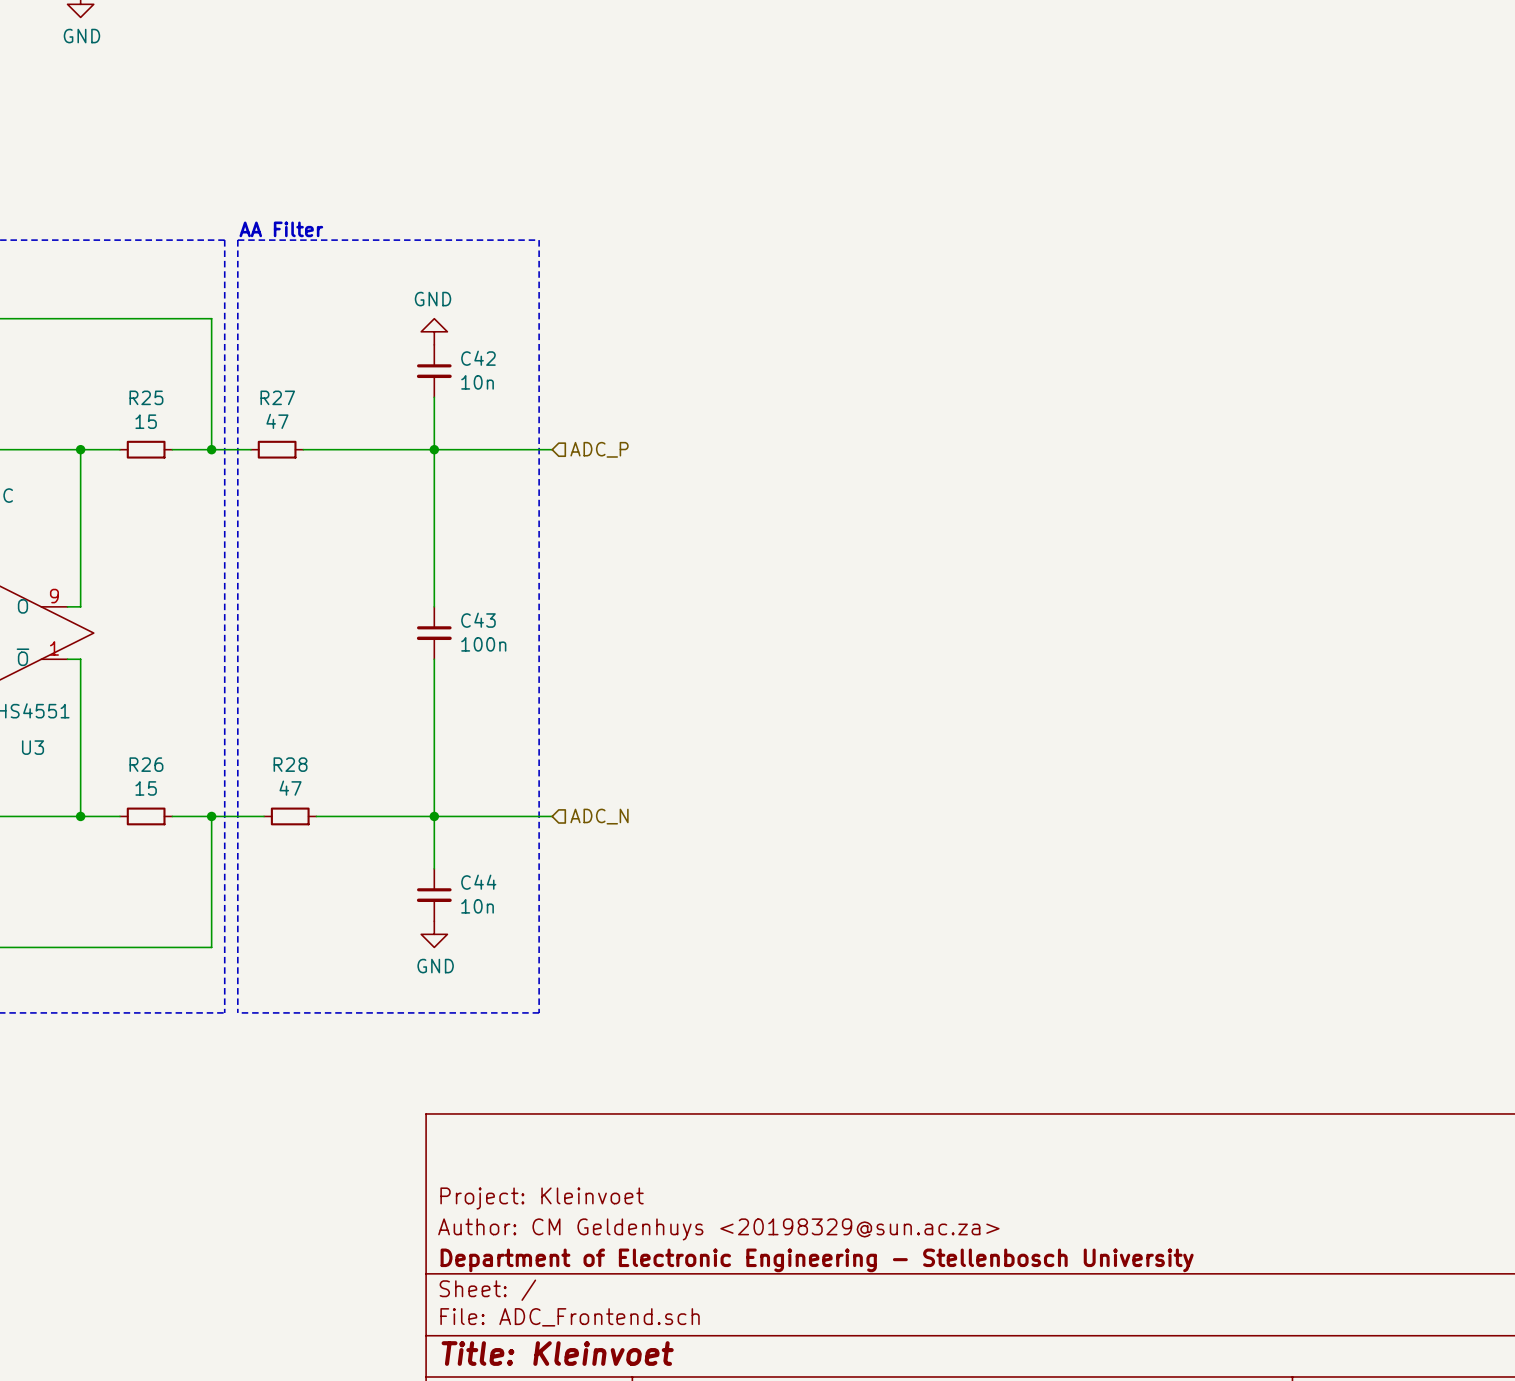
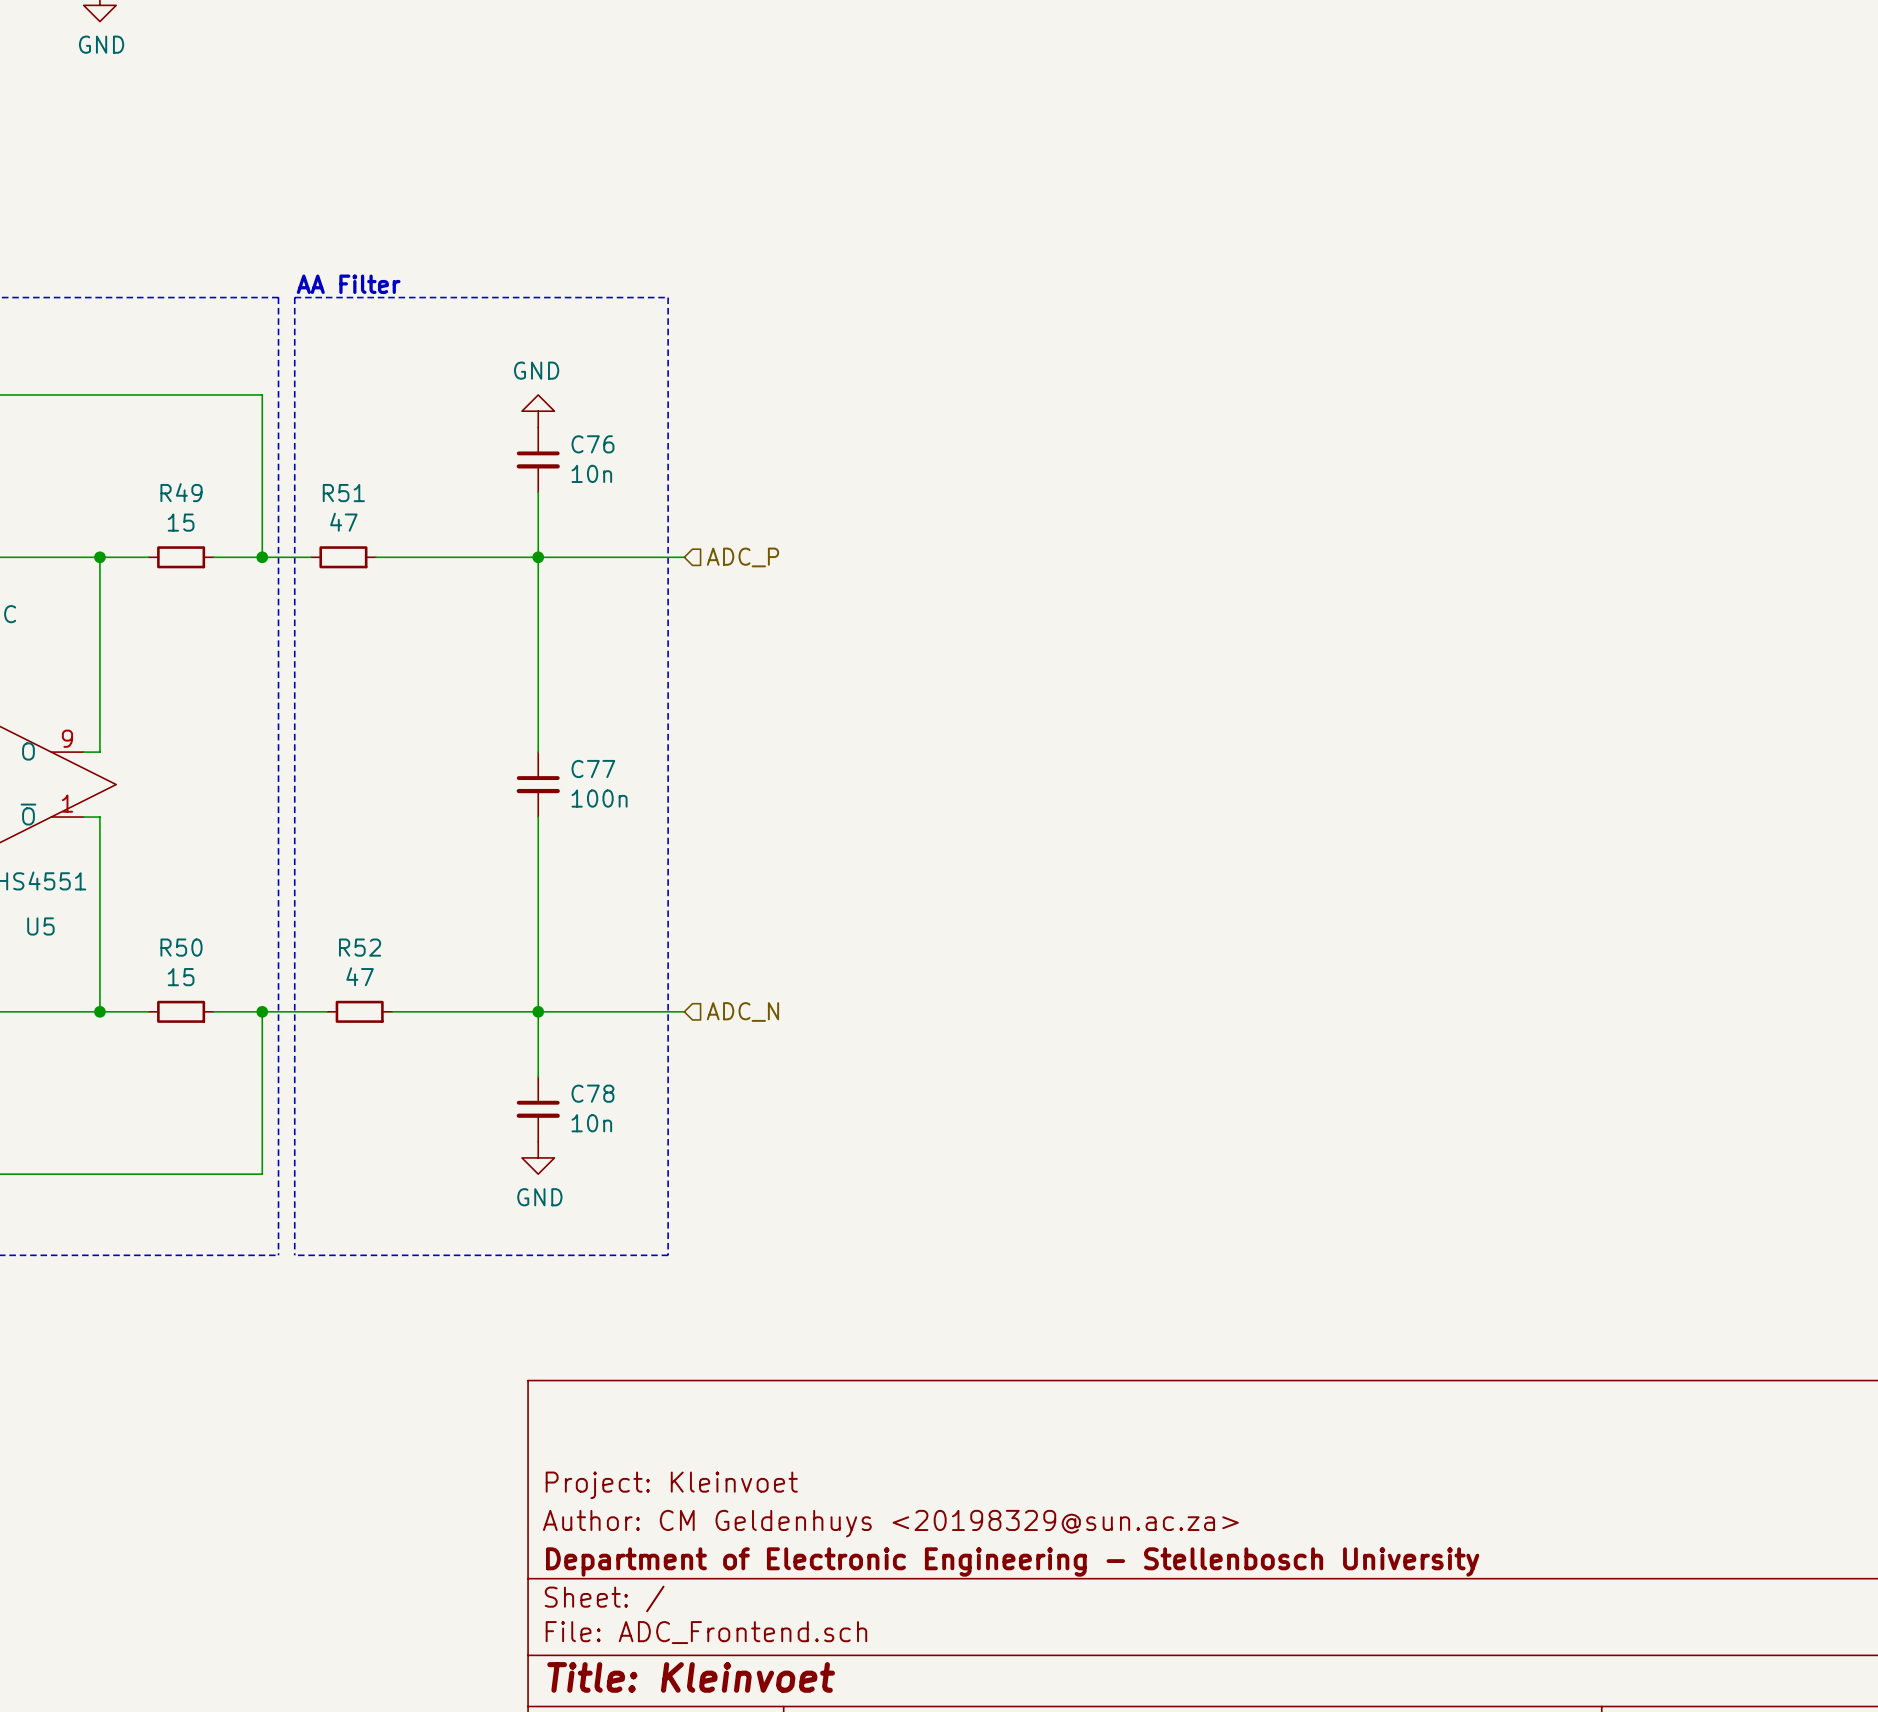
C42 name: C42 (478, 358) -> C76 (592, 444)
R25 name: R25 (146, 397) -> R49 (181, 492)
R27 name: R27 (277, 397) -> R51 (343, 493)
C43 name: C43 (478, 620) -> C77 (593, 769)
U3 name: U3 (33, 747) -> U5 (40, 926)
R26 name: R26 (146, 764) -> R50 (181, 947)
R28 name: R28 (290, 764) -> R52 (360, 947)
C44 name: C44 (478, 882) -> C78 (592, 1093)

